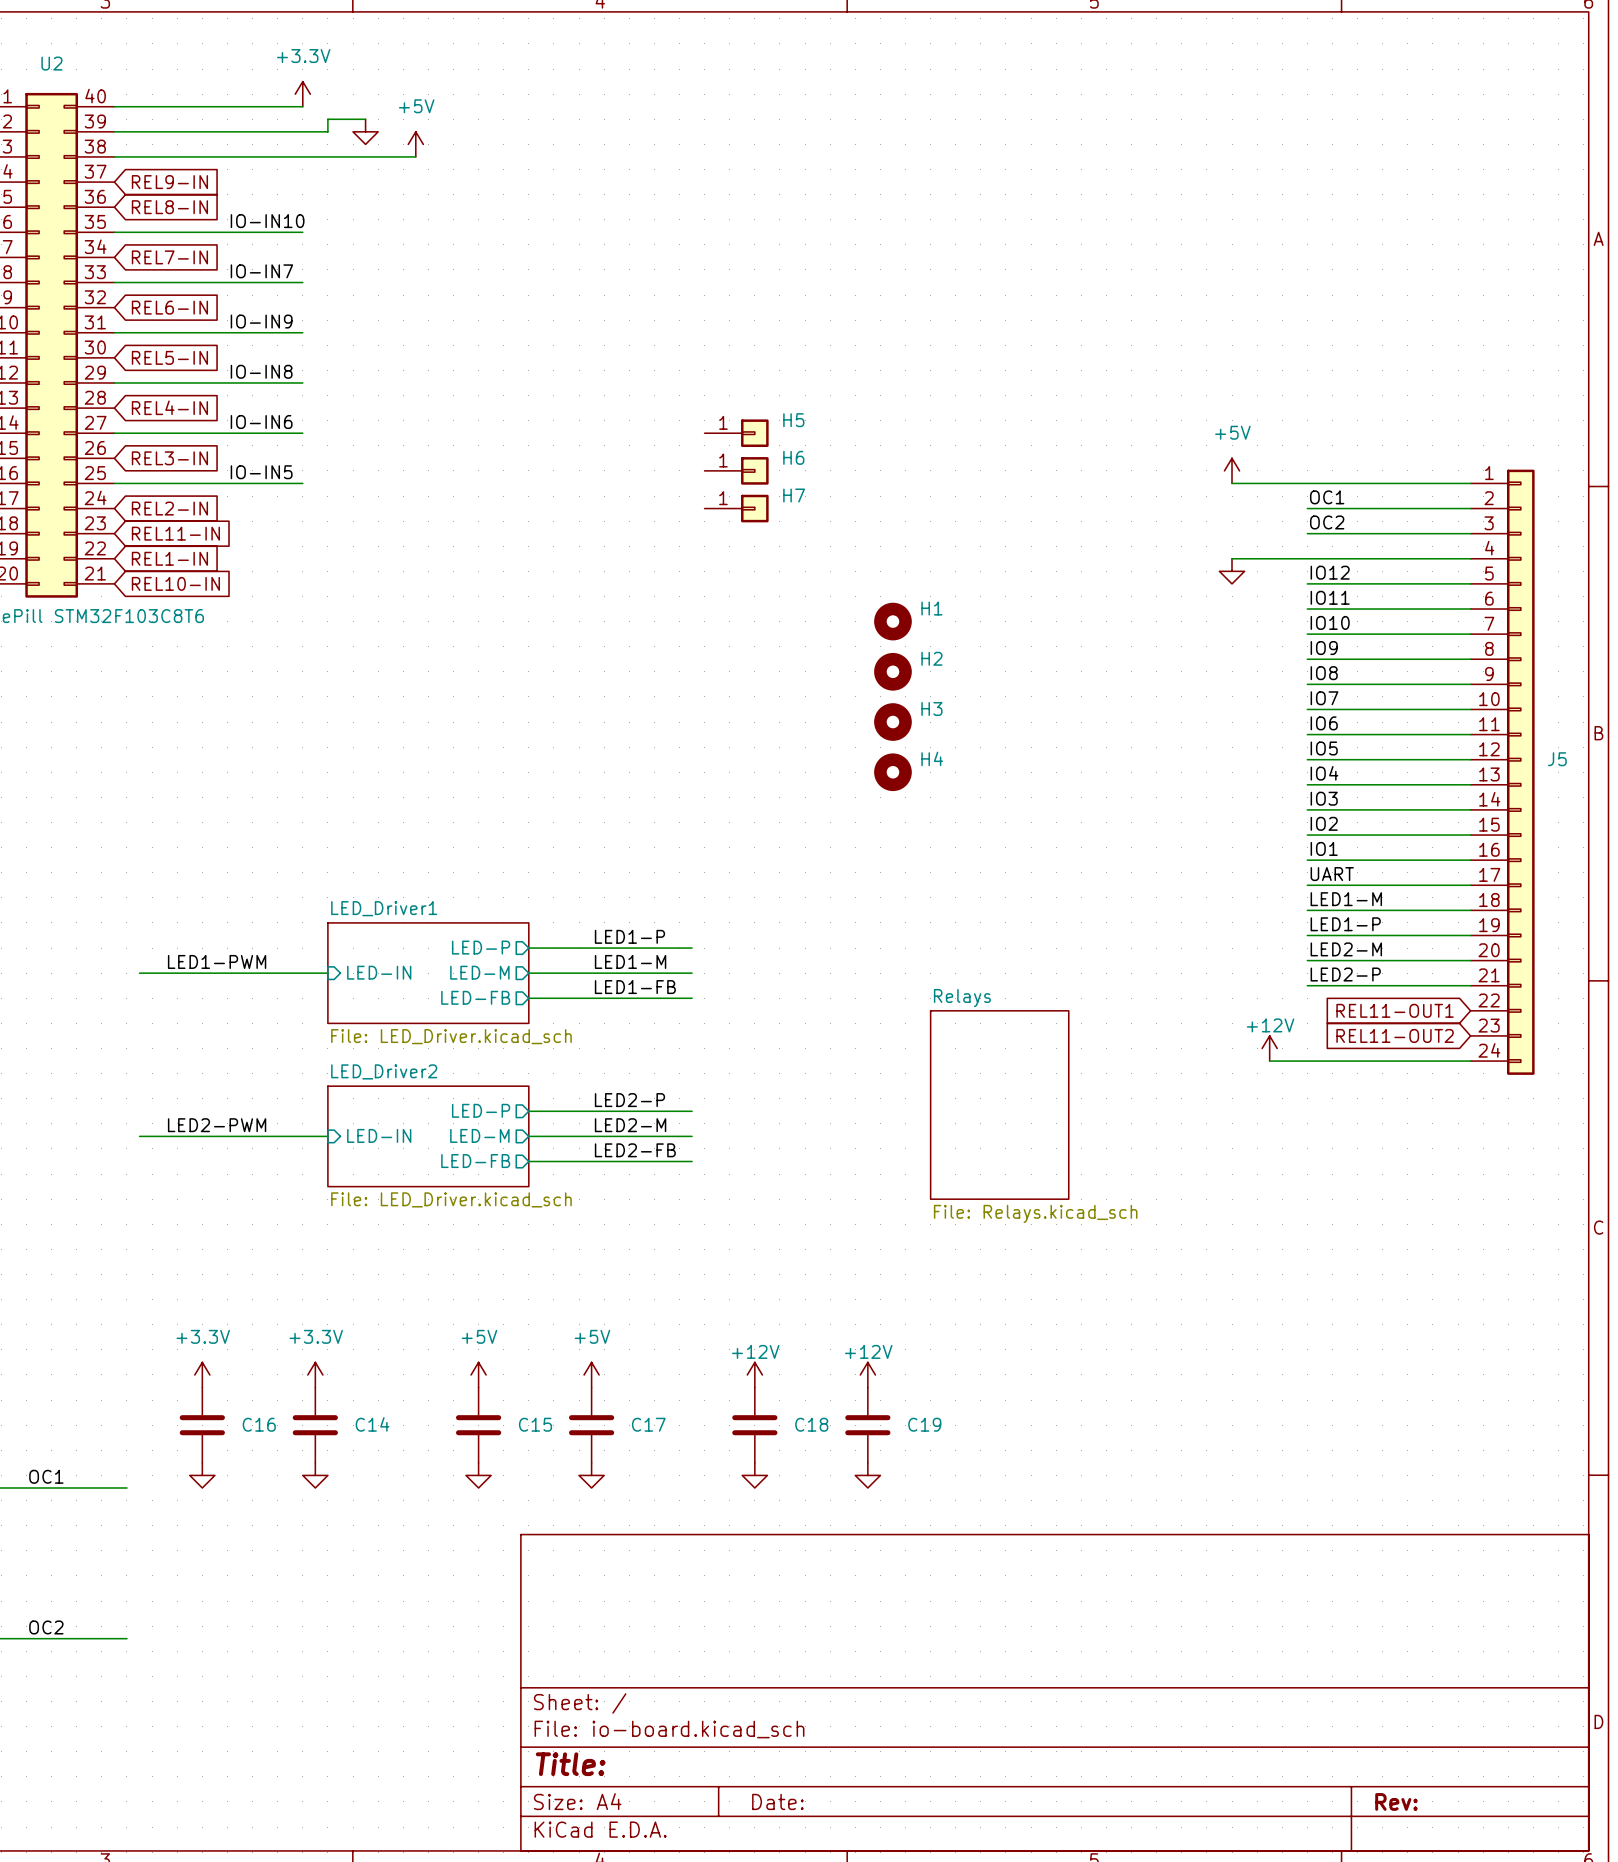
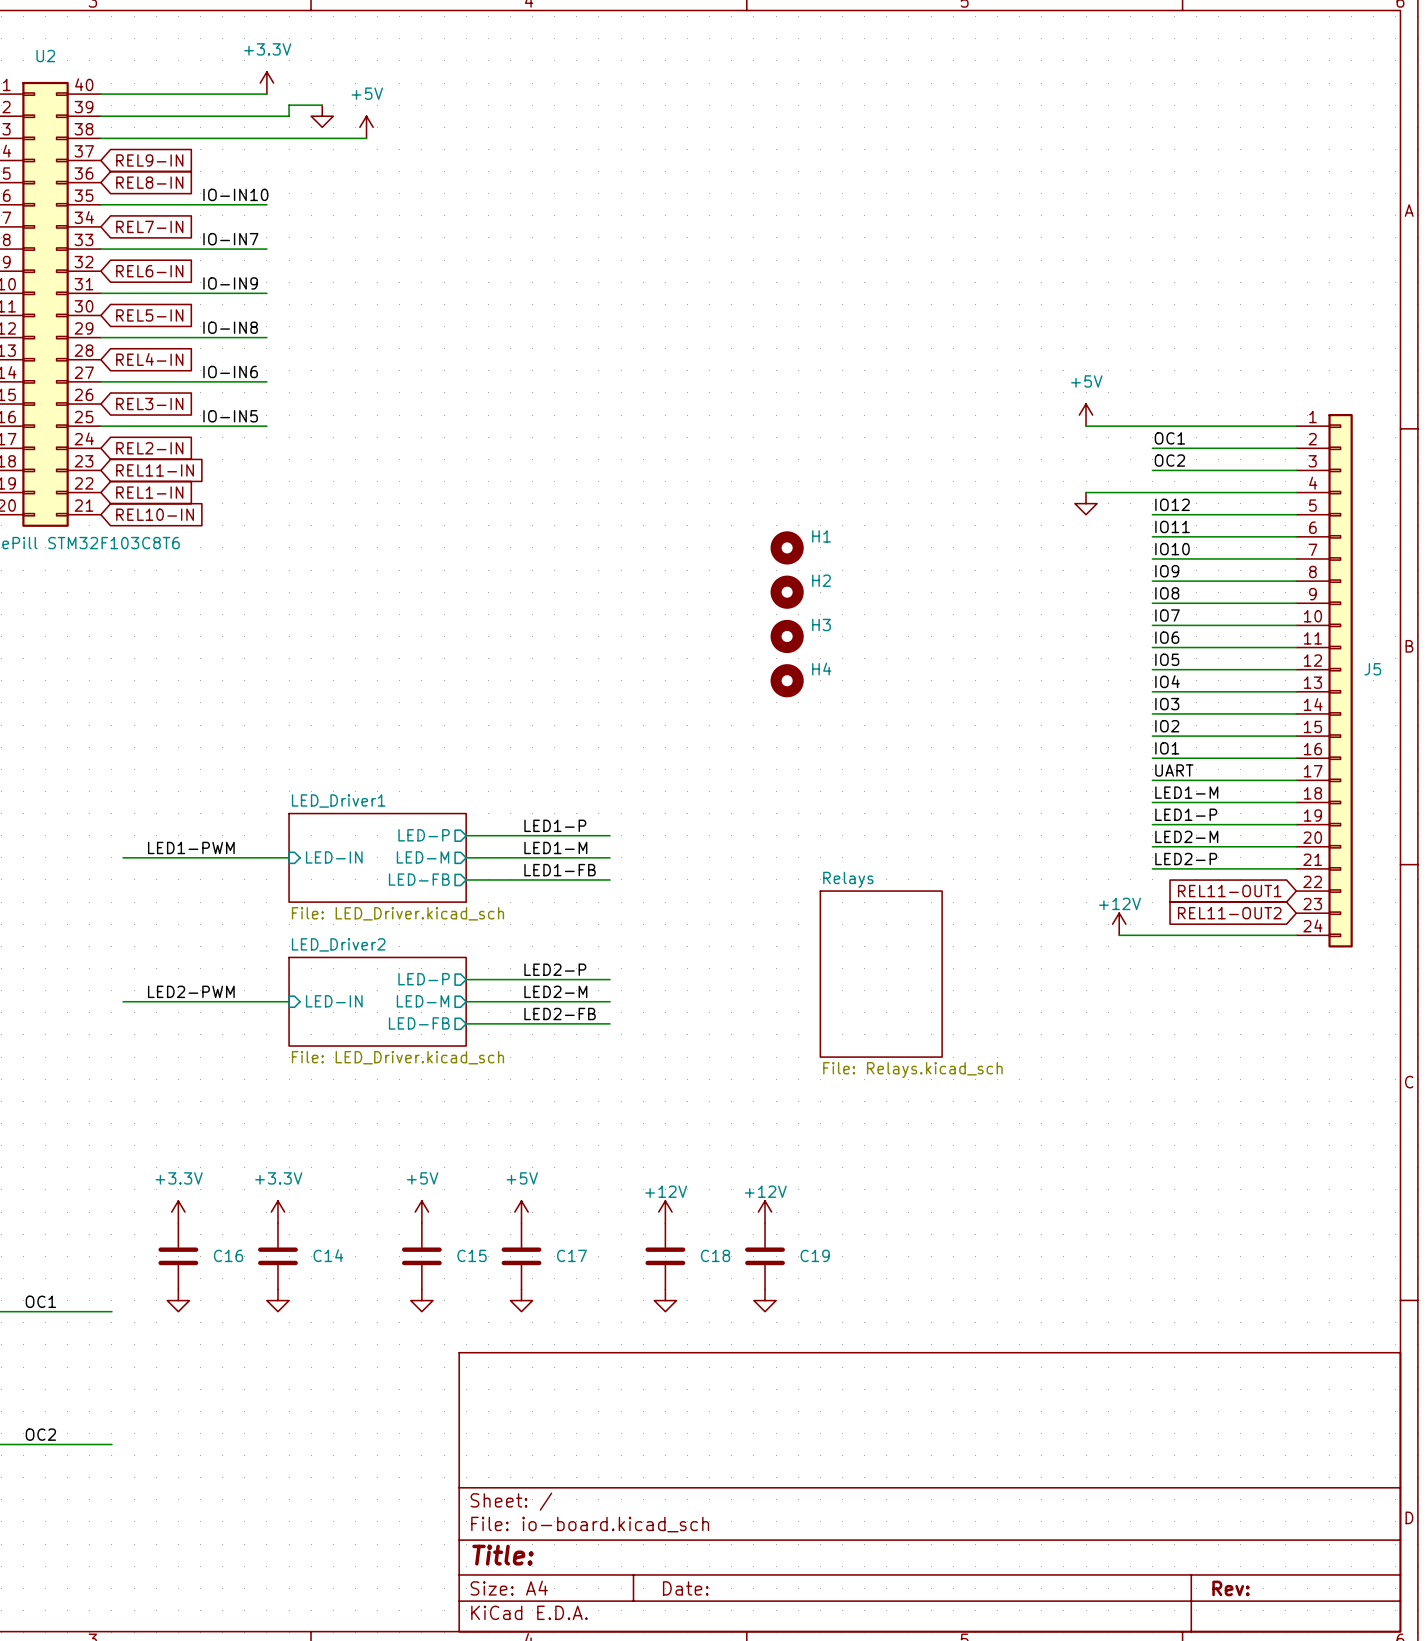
H5: (736, 433) -> none
H6: (736, 470) -> none
H7: (736, 508) -> none

